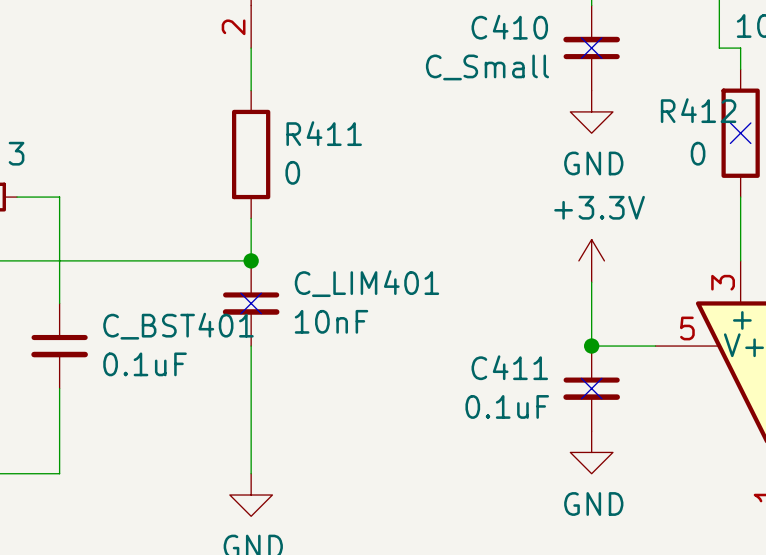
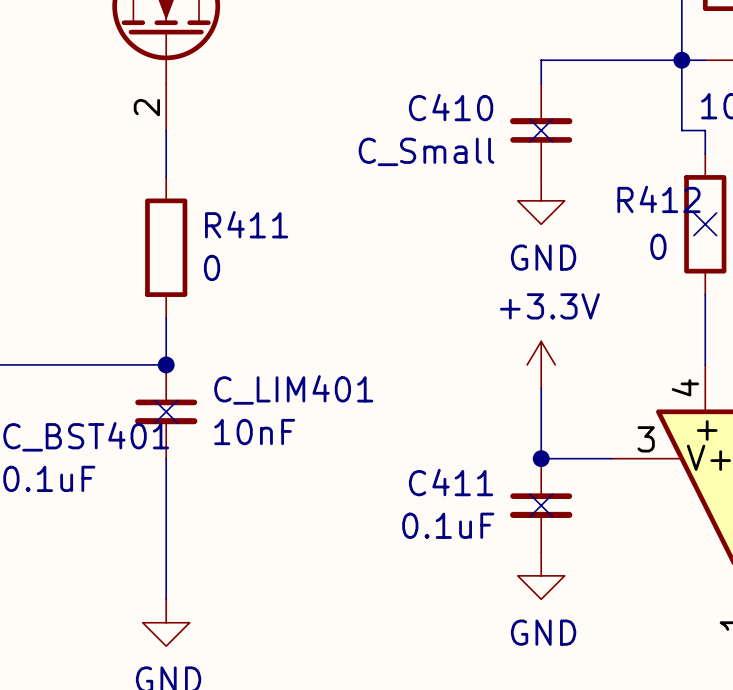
part pin number: 3 (723, 282) -> 4 (685, 387)
part pin number: 5 (687, 328) -> 3 (646, 439)

